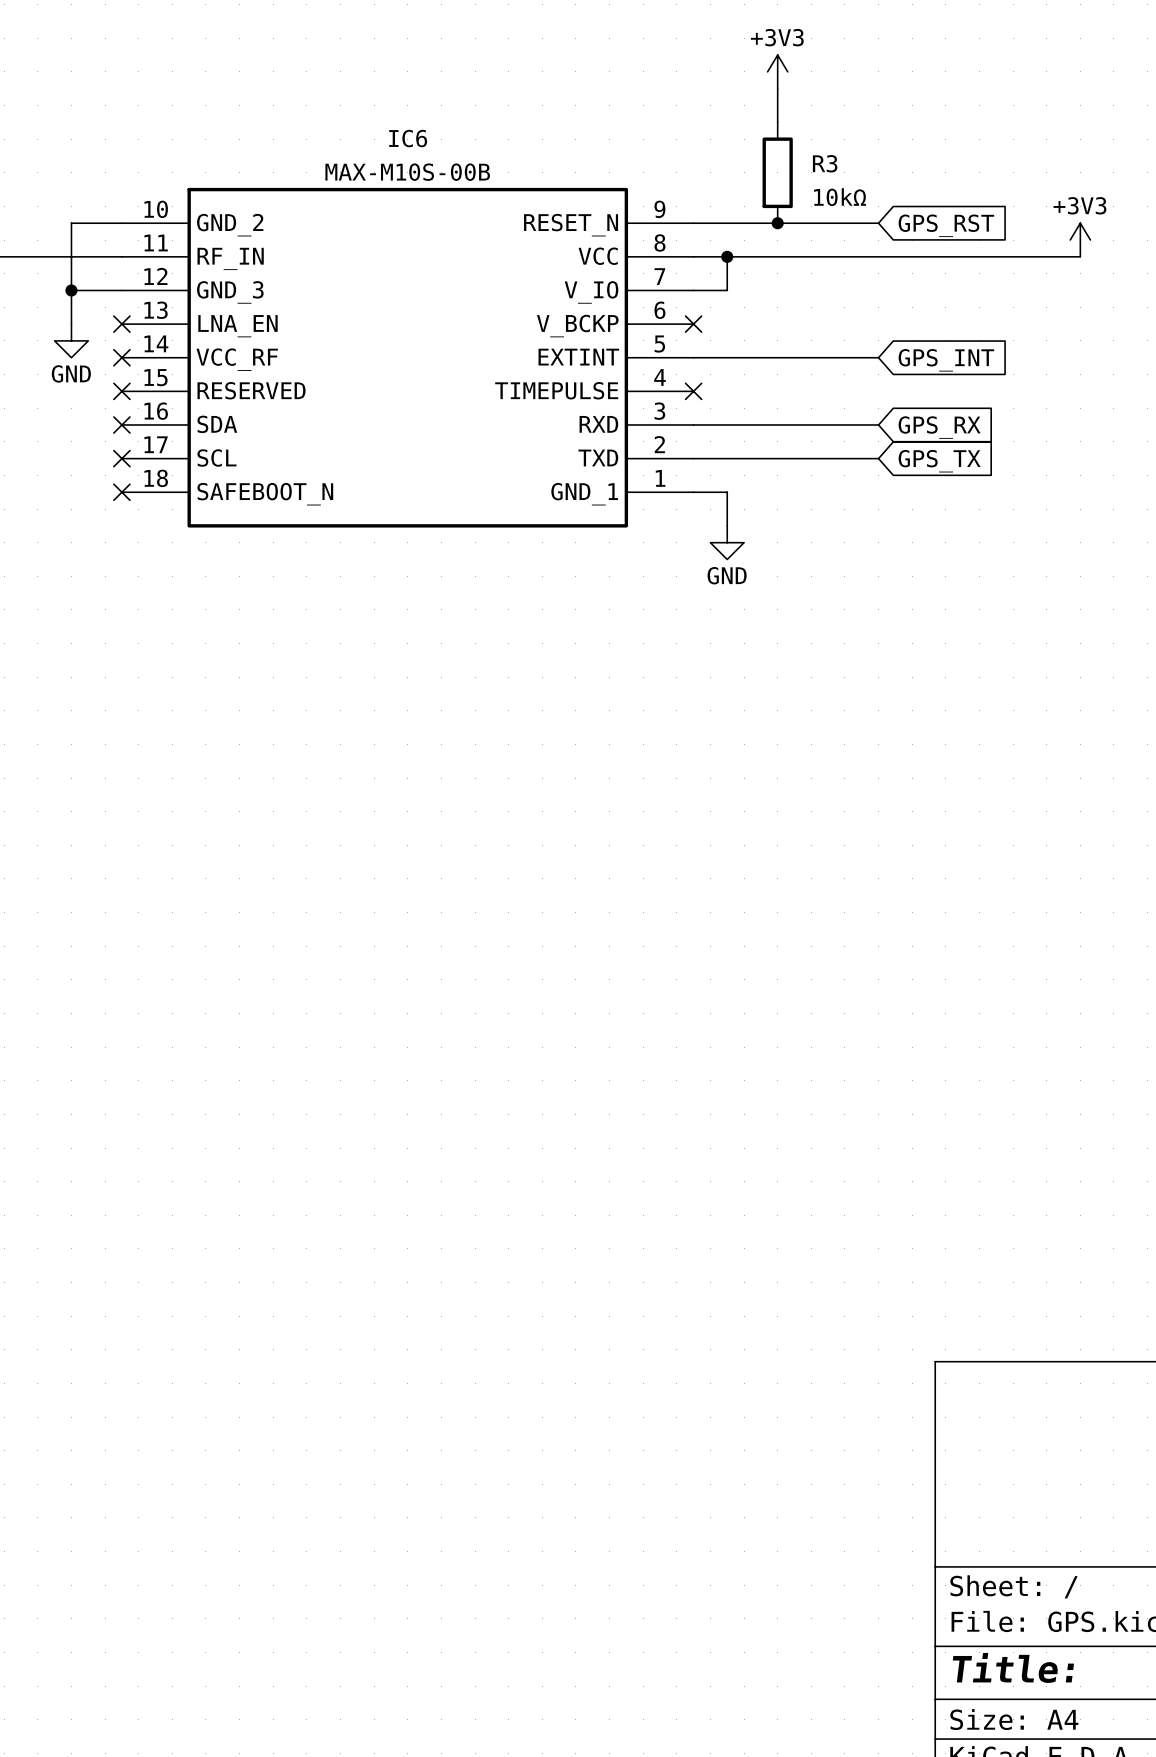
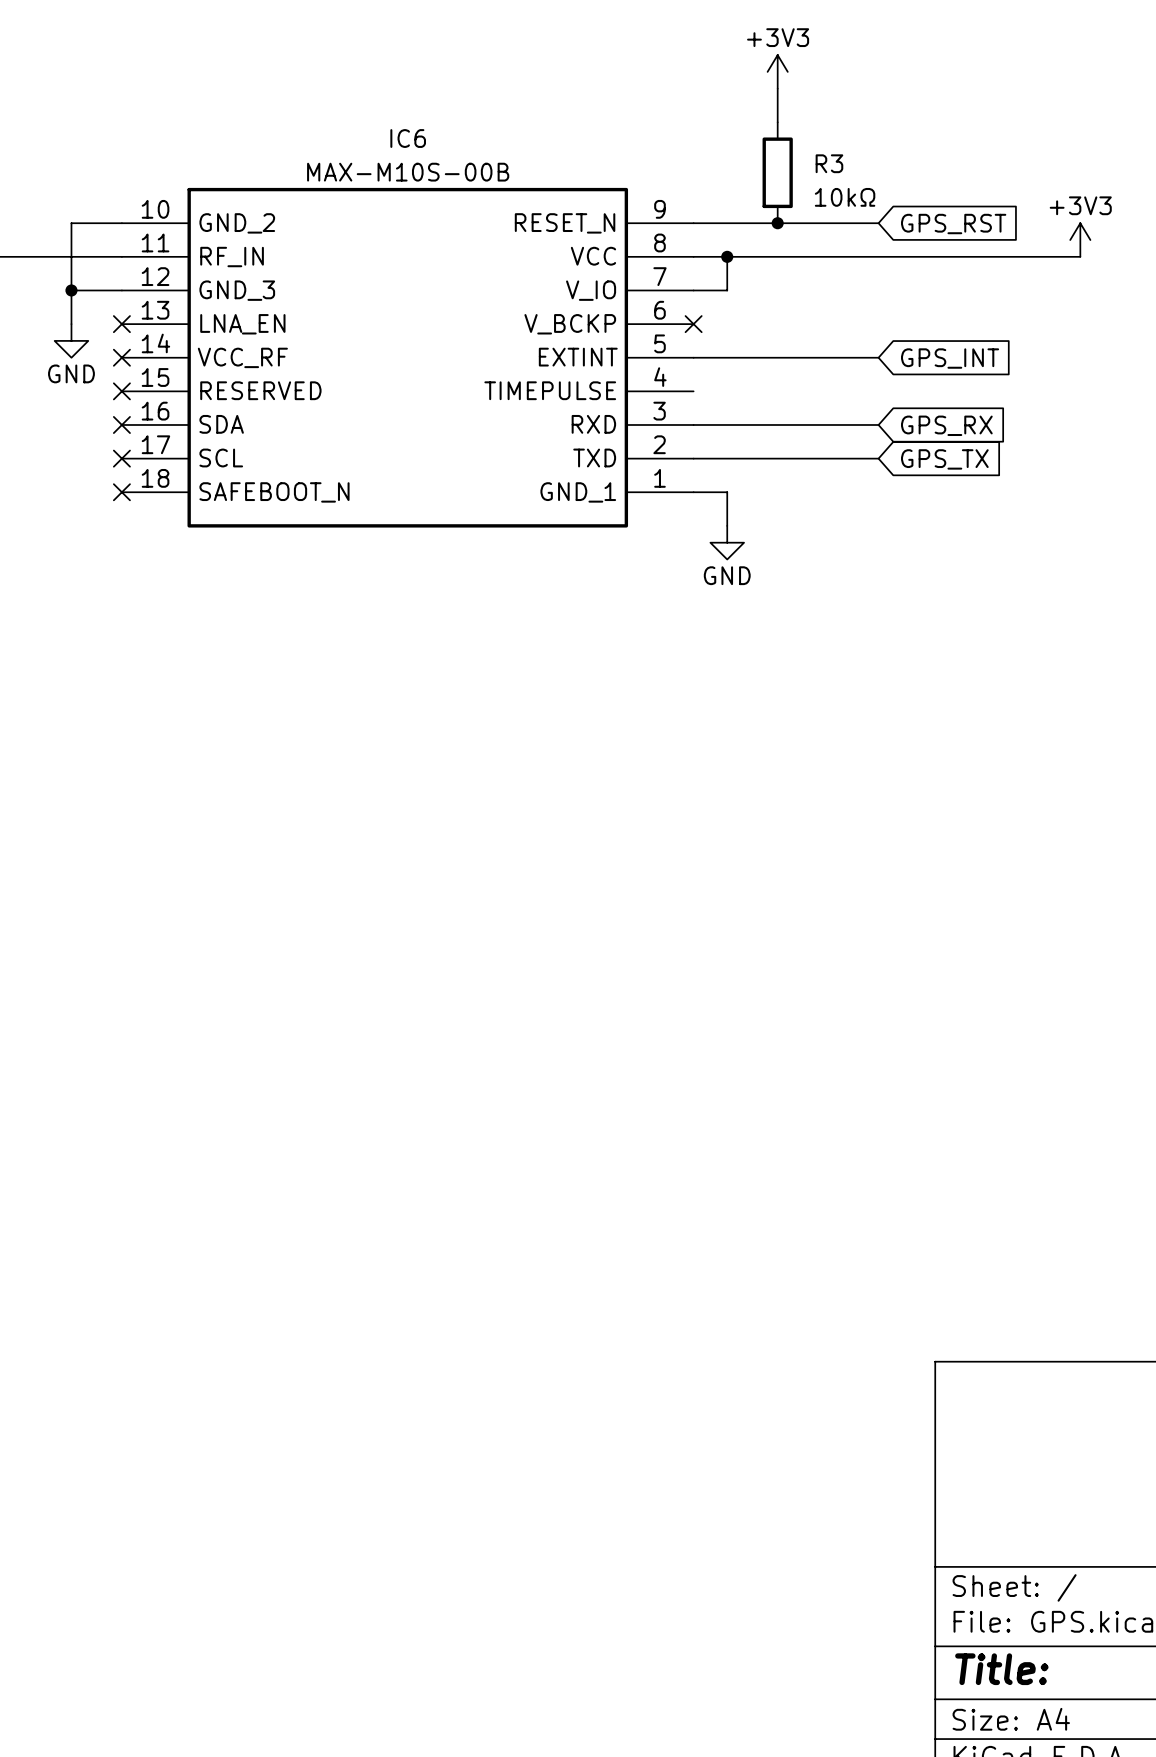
no-connect mark: (693, 391) -> none

